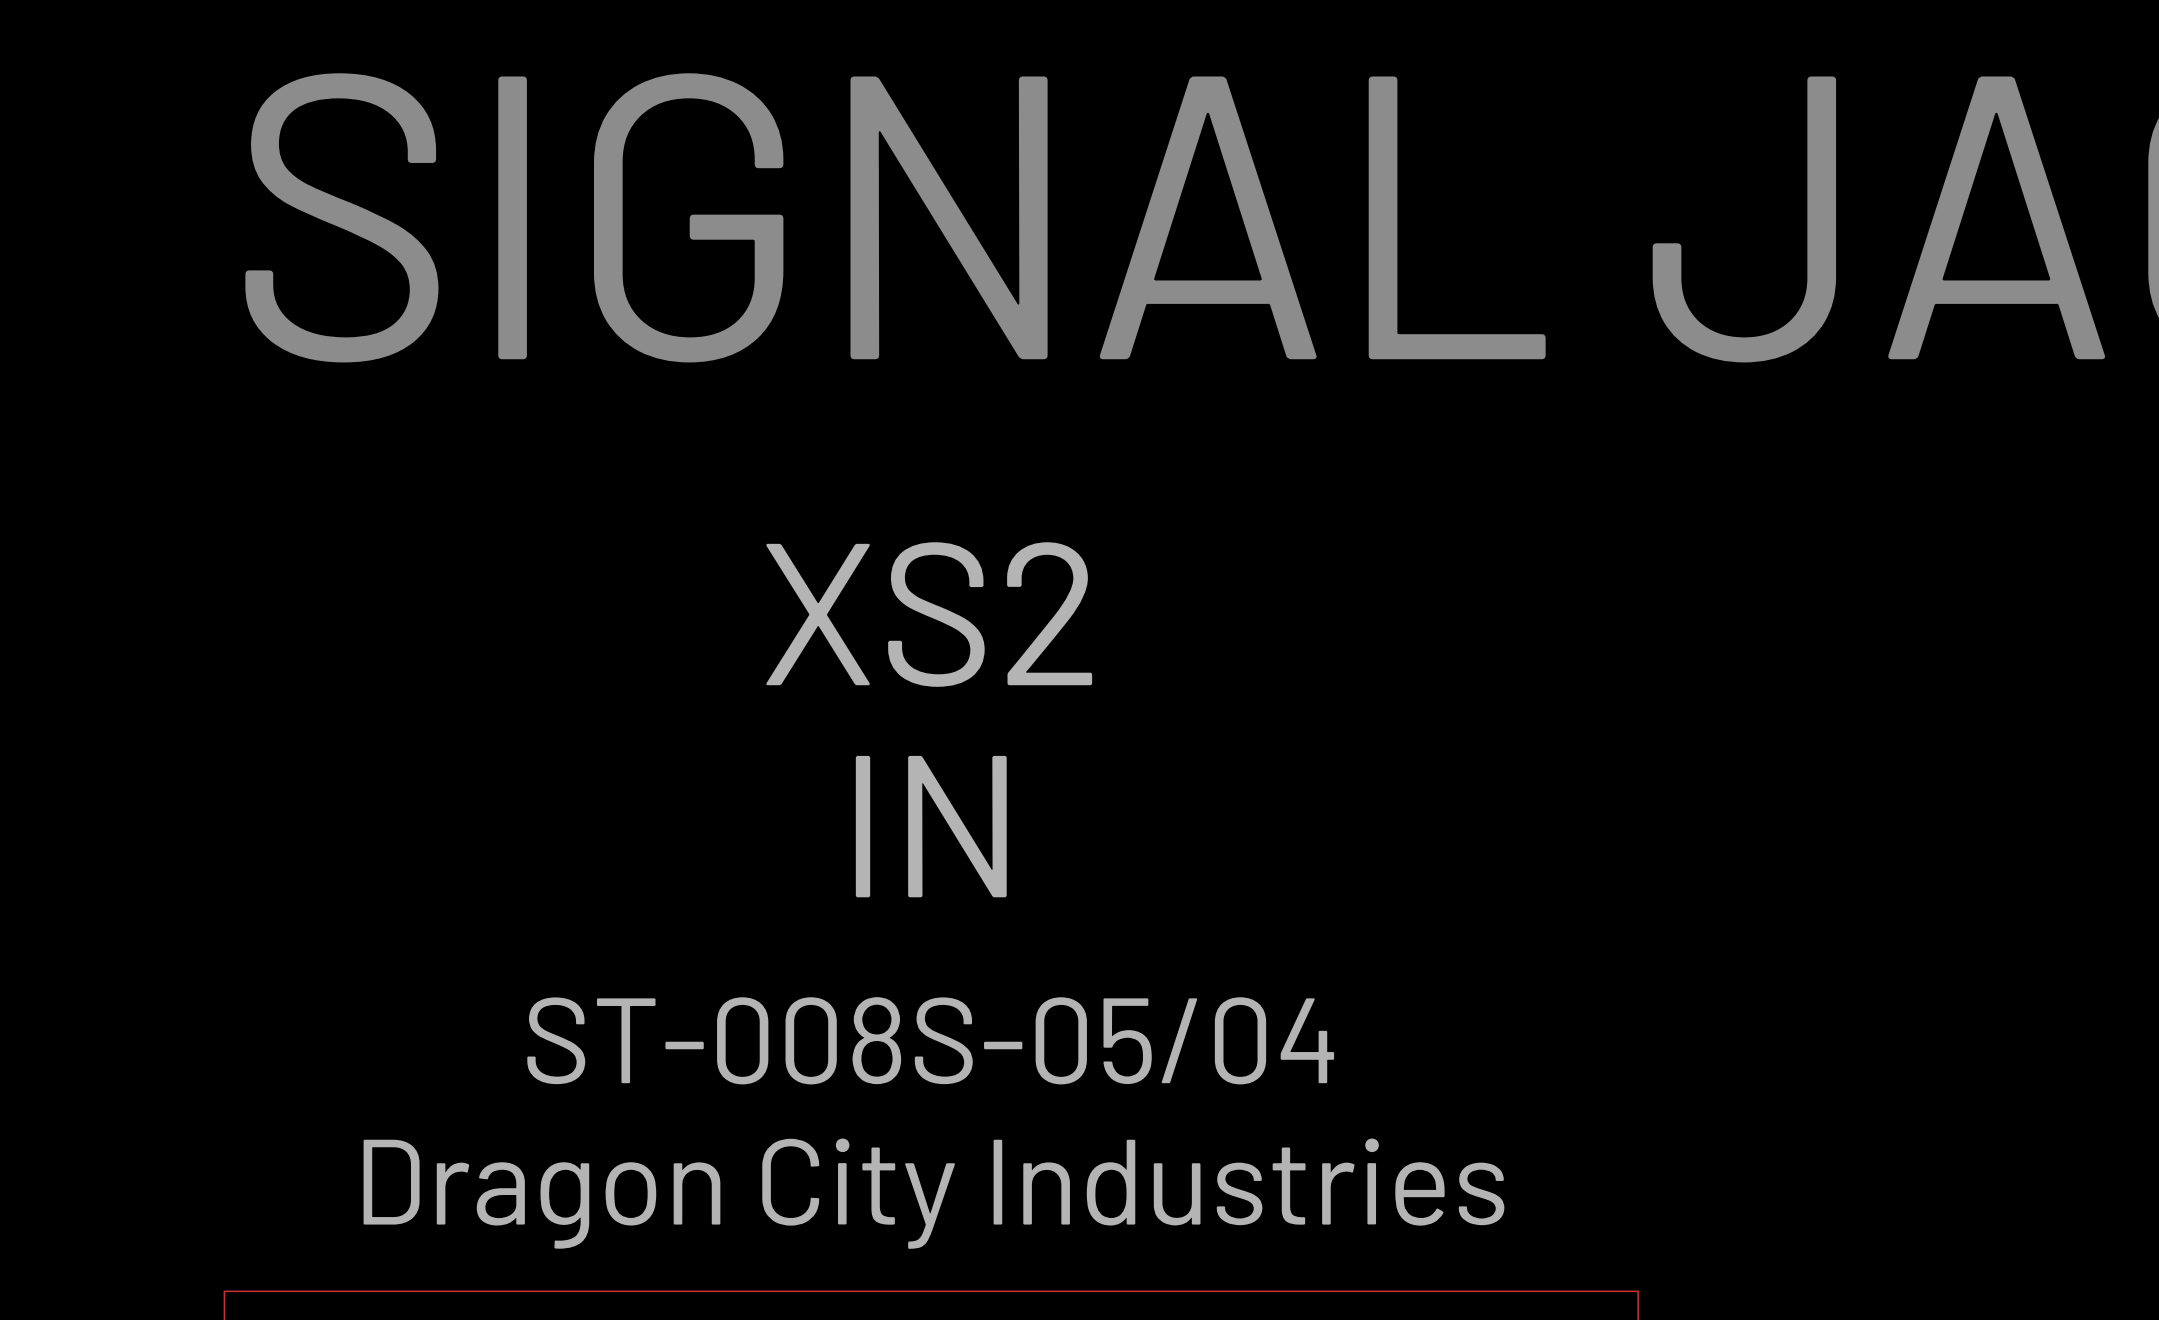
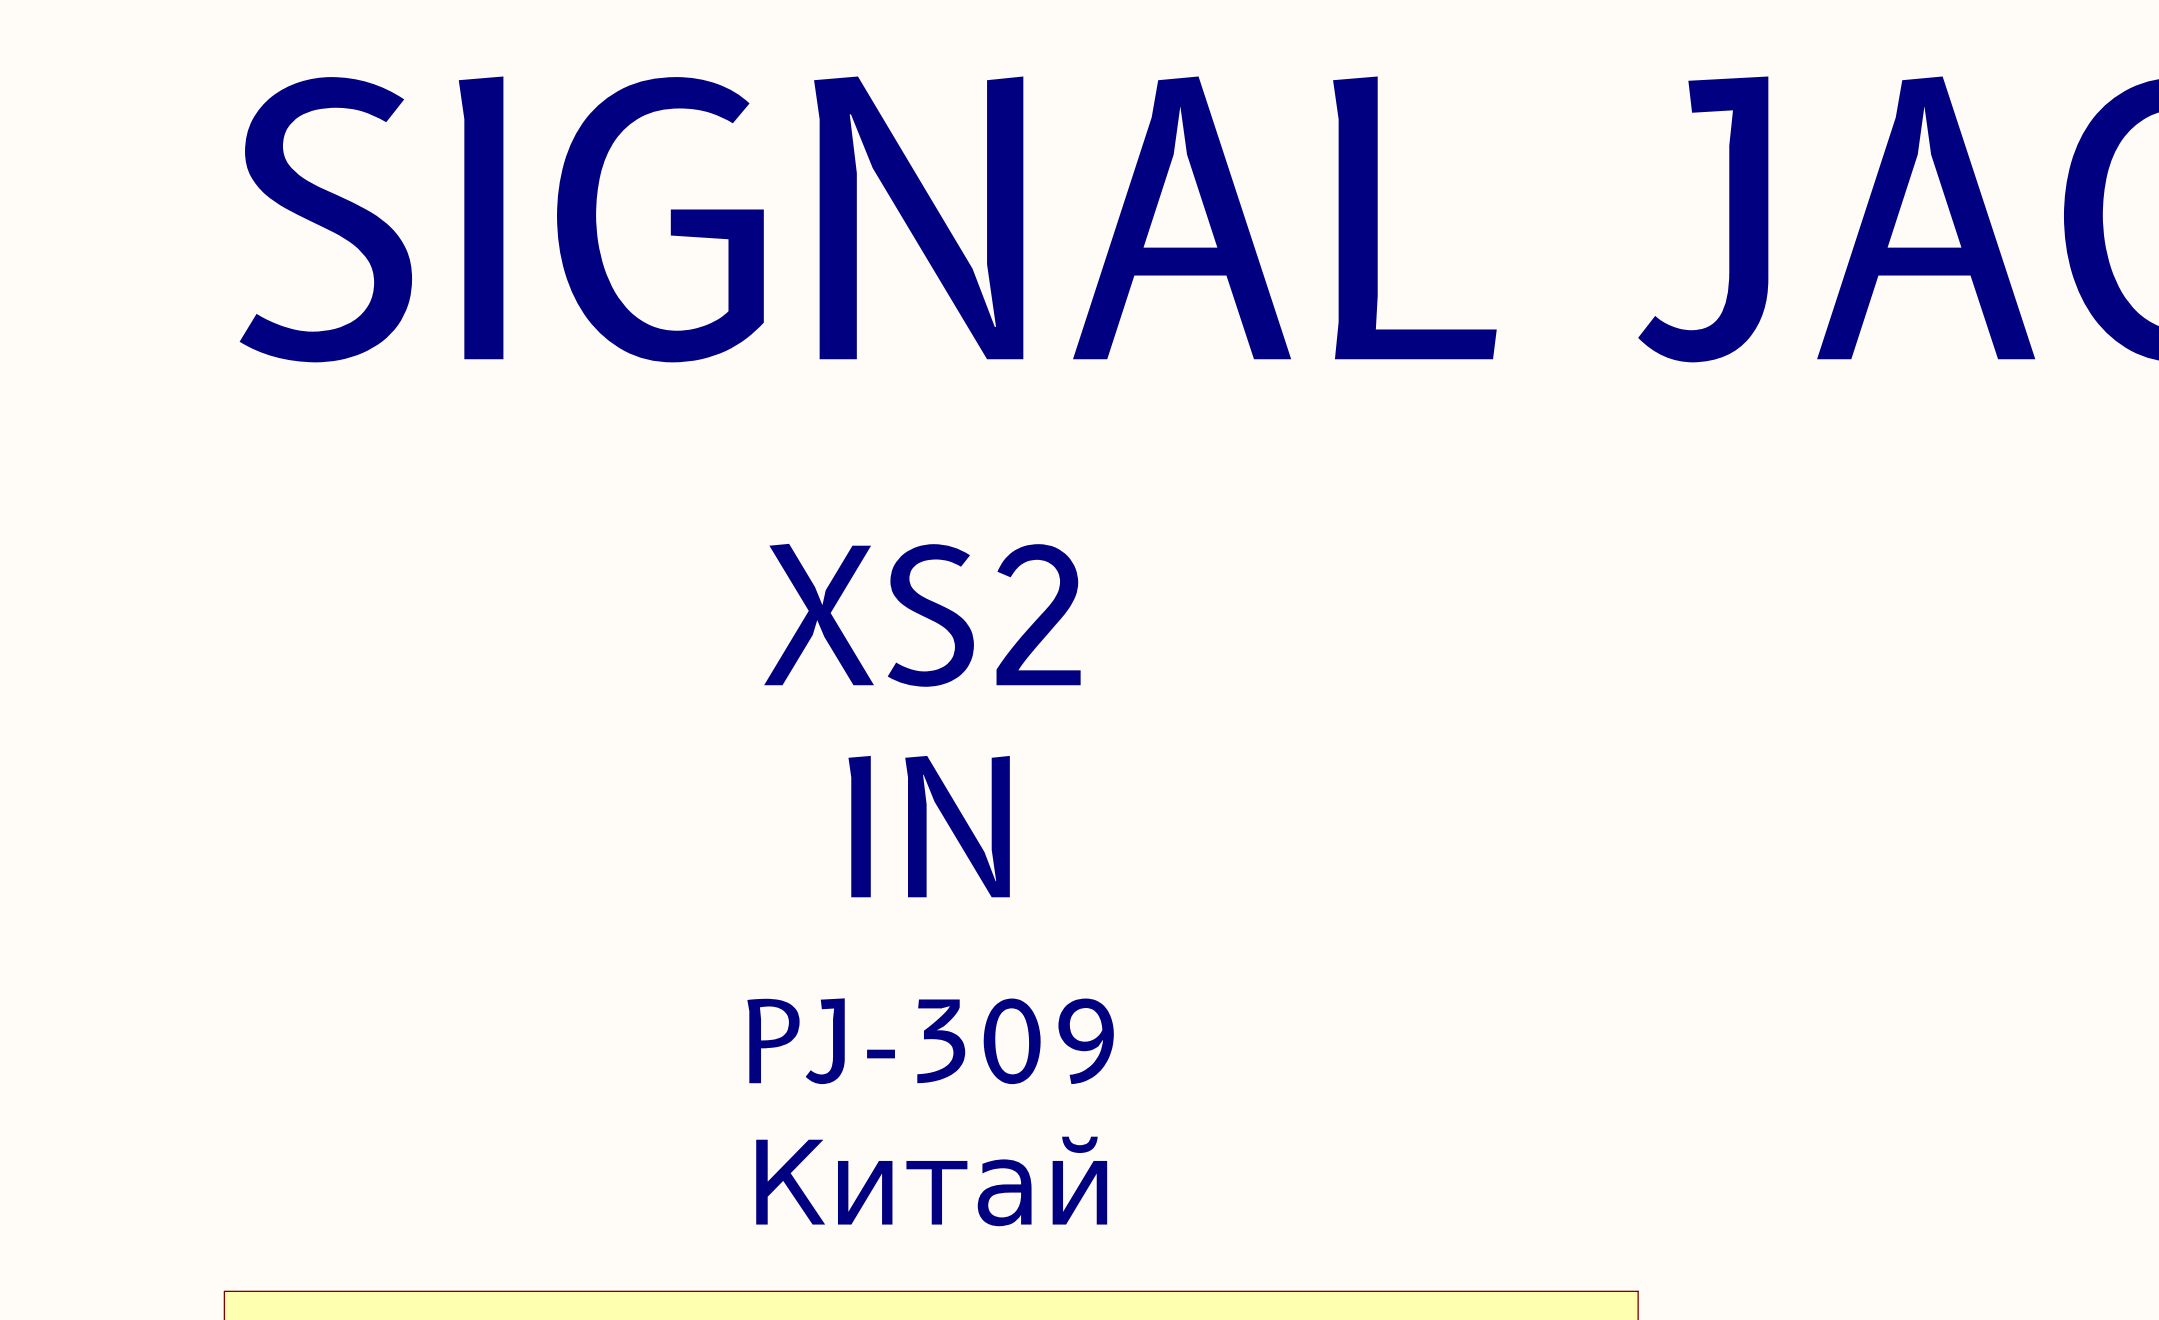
XS2 text: ST-008S-05/04 (930, 1040) -> PJ-309 (930, 1041)
XS2 text: Dragon City Industries (933, 1193) -> Китай (931, 1181)

